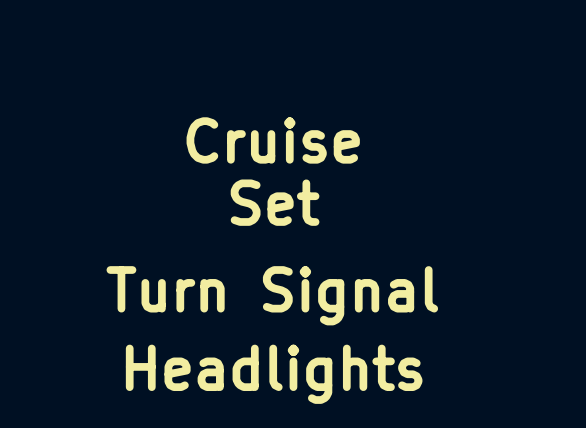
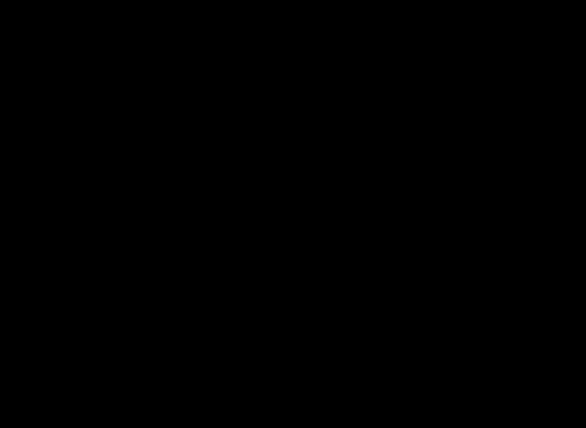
text: Cruise (273, 140) -> none
text: Set (275, 202) -> none
text: Turn Signal (272, 295) -> none
text: Headlights (274, 374) -> none

